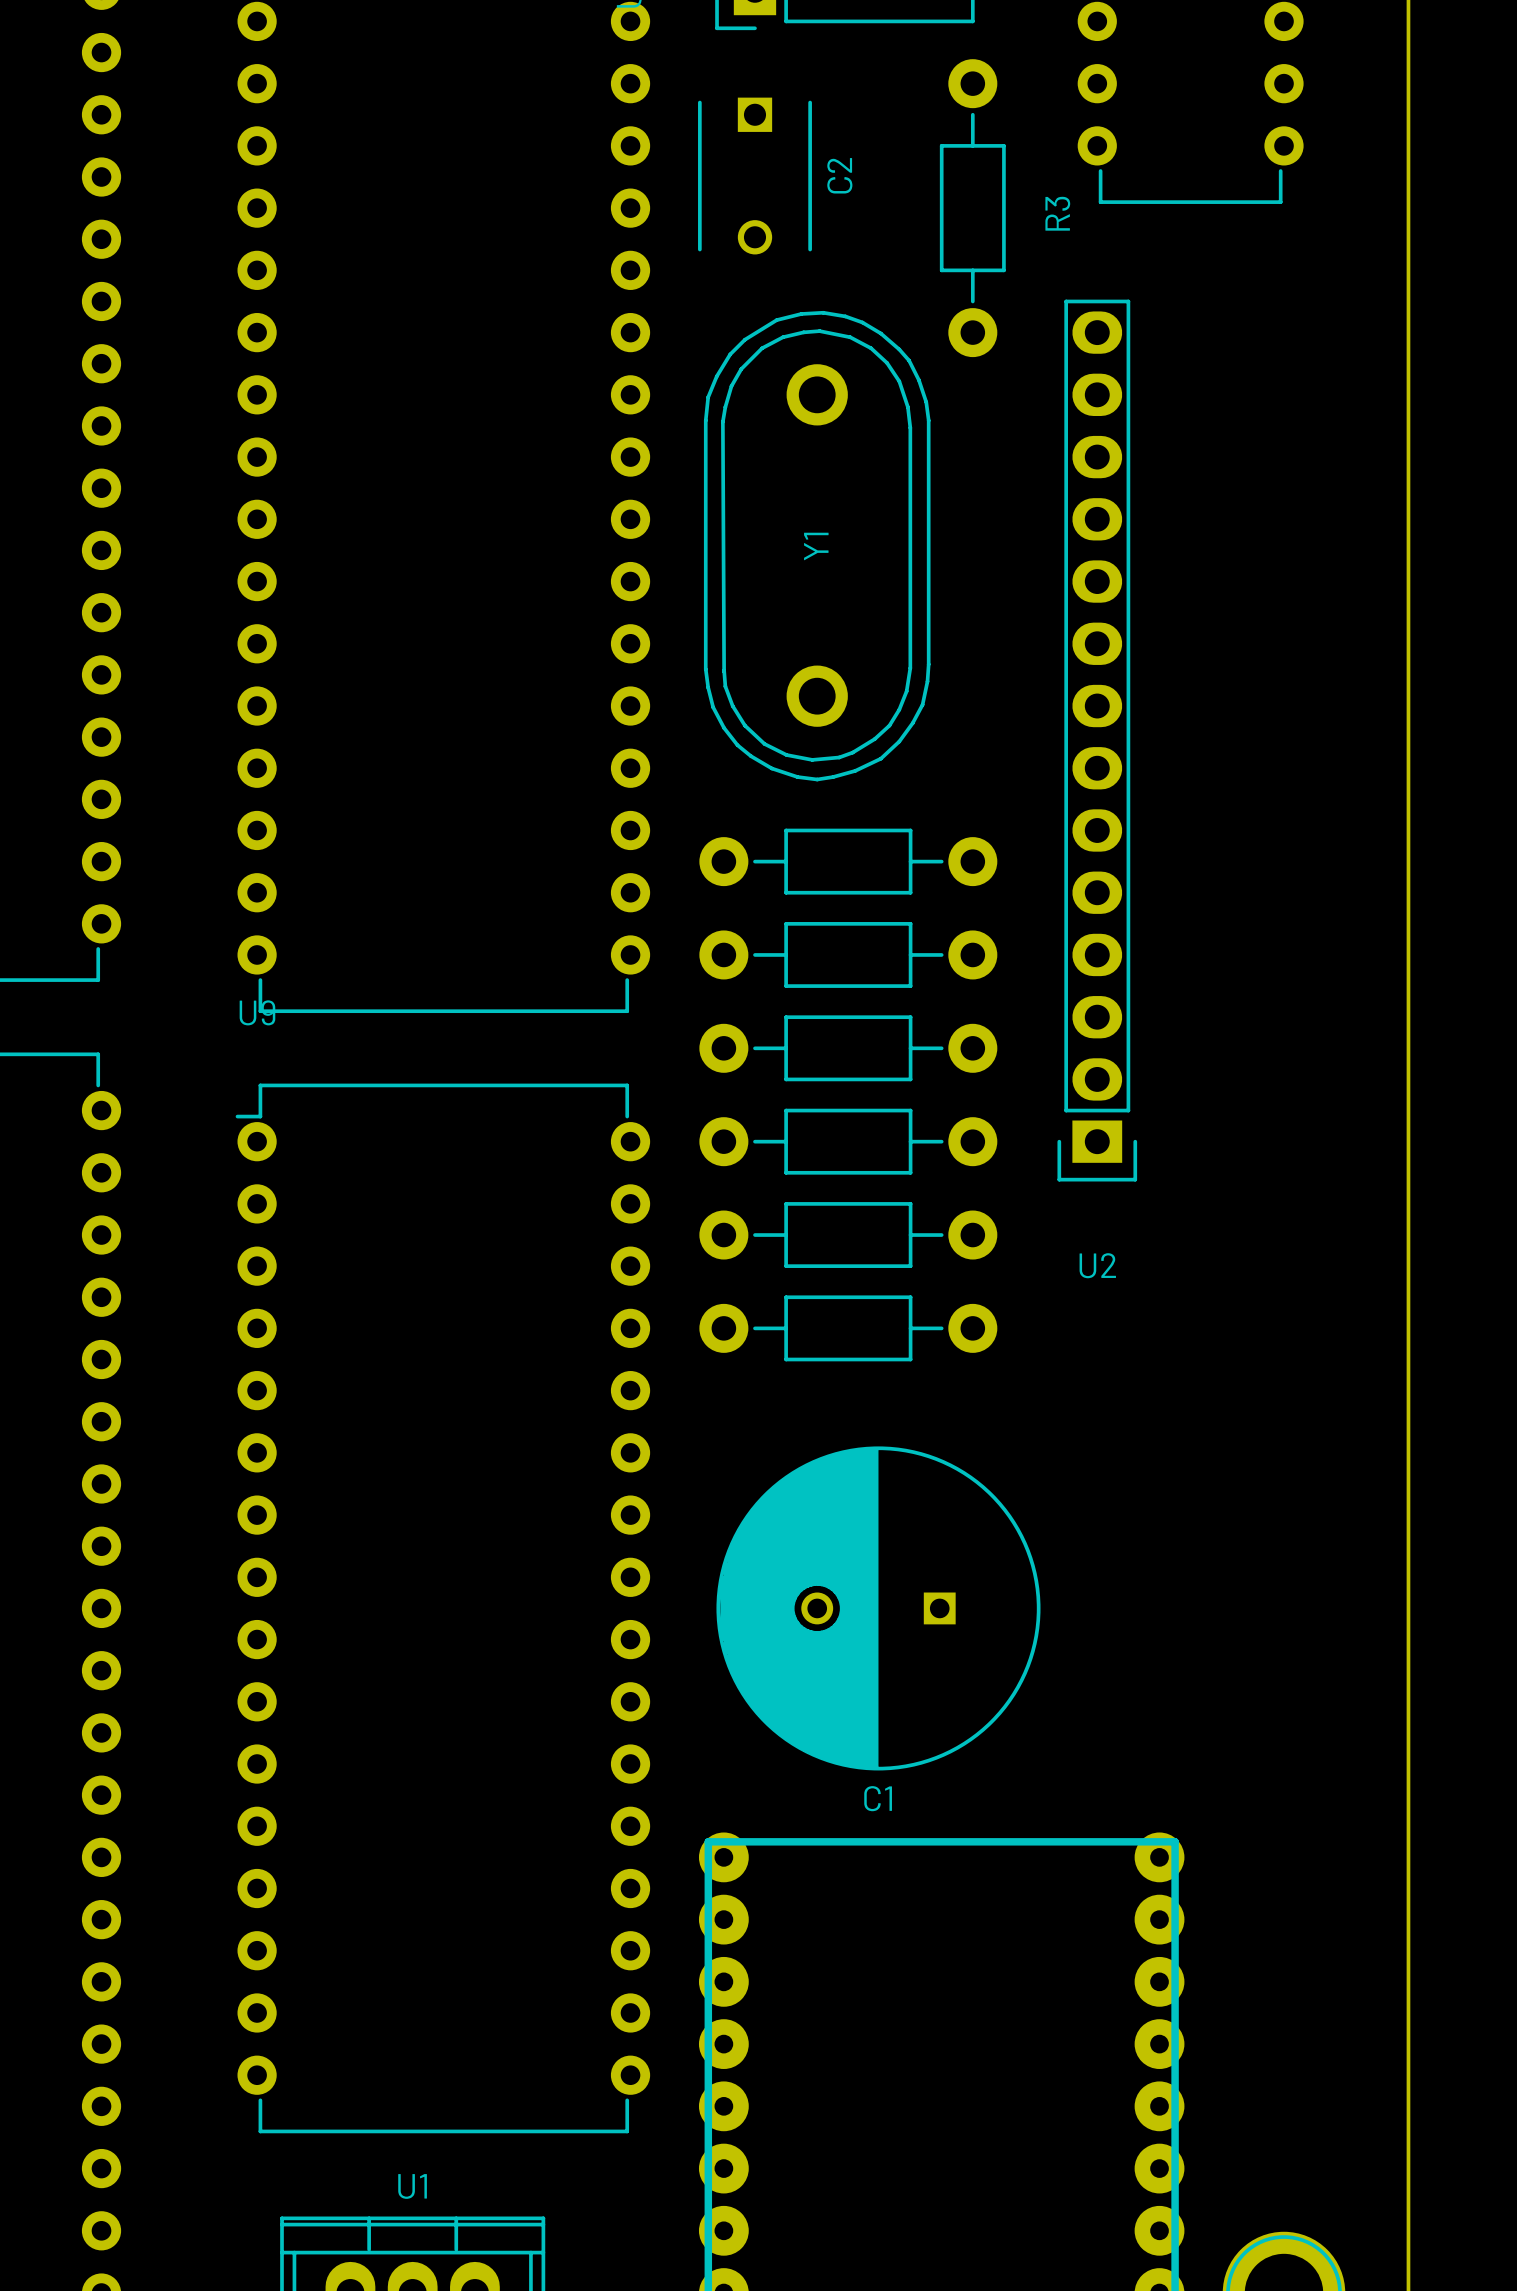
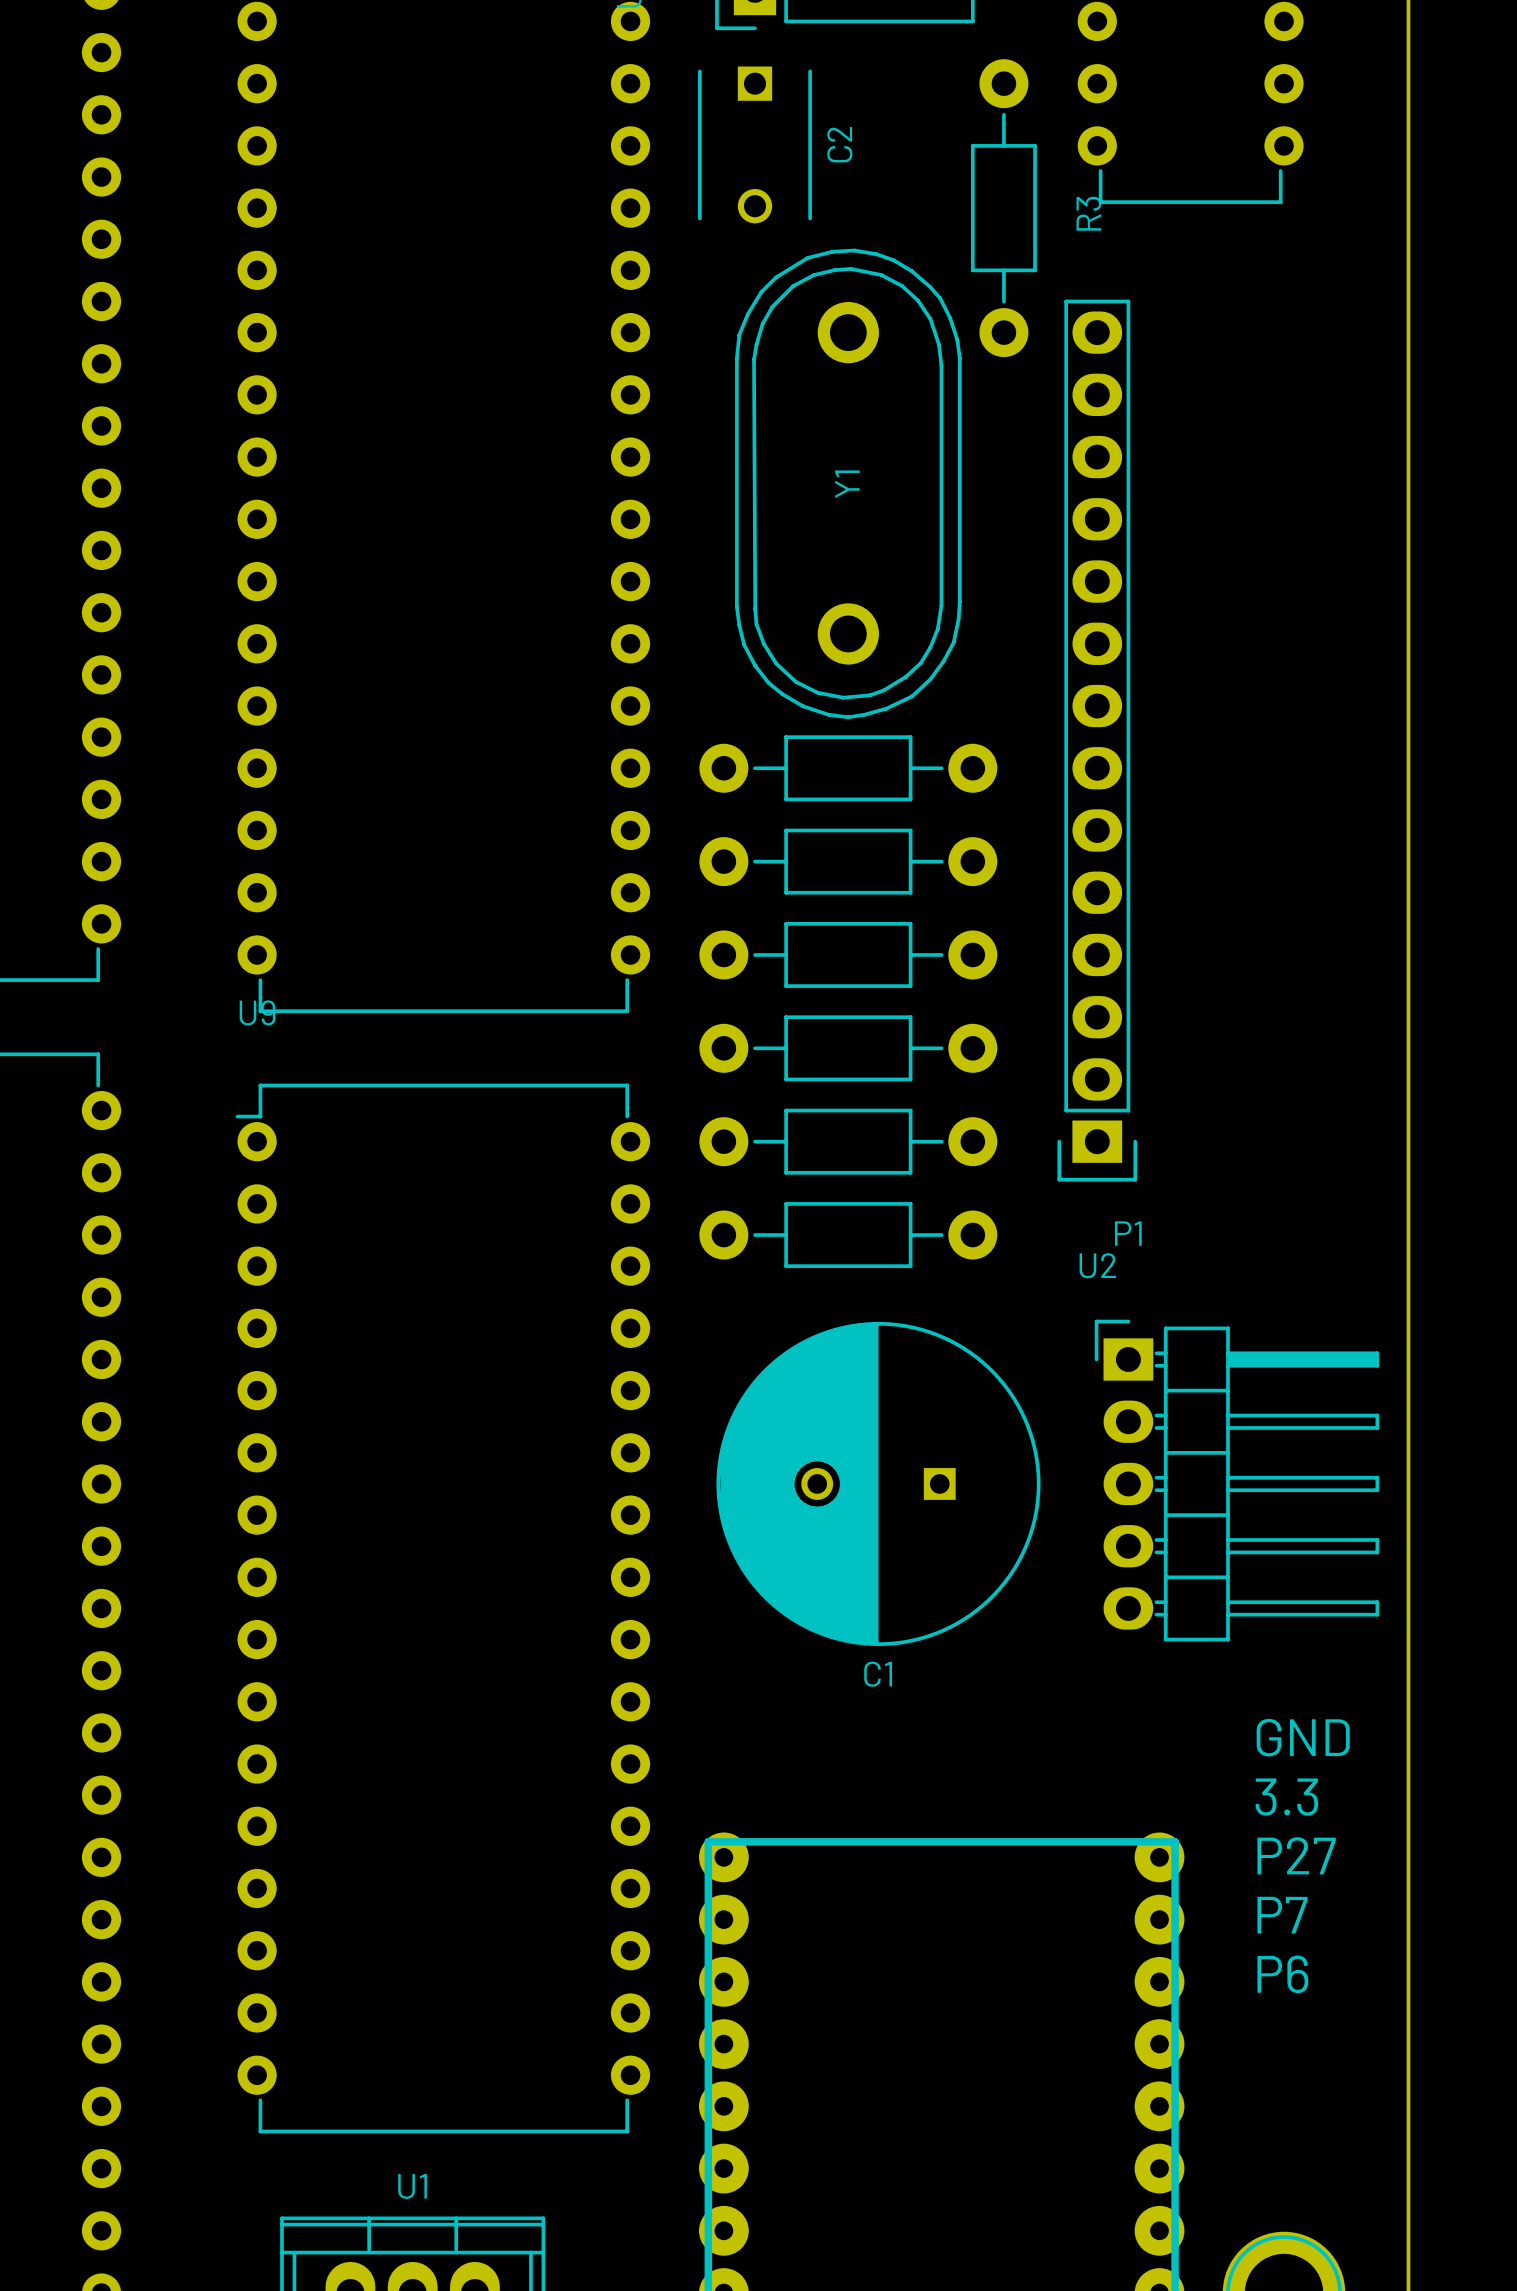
C2 position: (754, 176) -> (754, 144)
R3 position: (972, 208) -> (1003, 208)
Y1 position: (817, 546) -> (848, 483)
part position: (848, 1328) -> (848, 768)
P1: none -> (1236, 1480)
C1 position: (878, 1608) -> (878, 1483)
text: none -> GND (1303, 1737)
text: none -> 3.3 (1286, 1797)
text: none -> P27 (1296, 1855)
text: none -> P7 (1282, 1915)
text: none -> P6 (1282, 1974)

